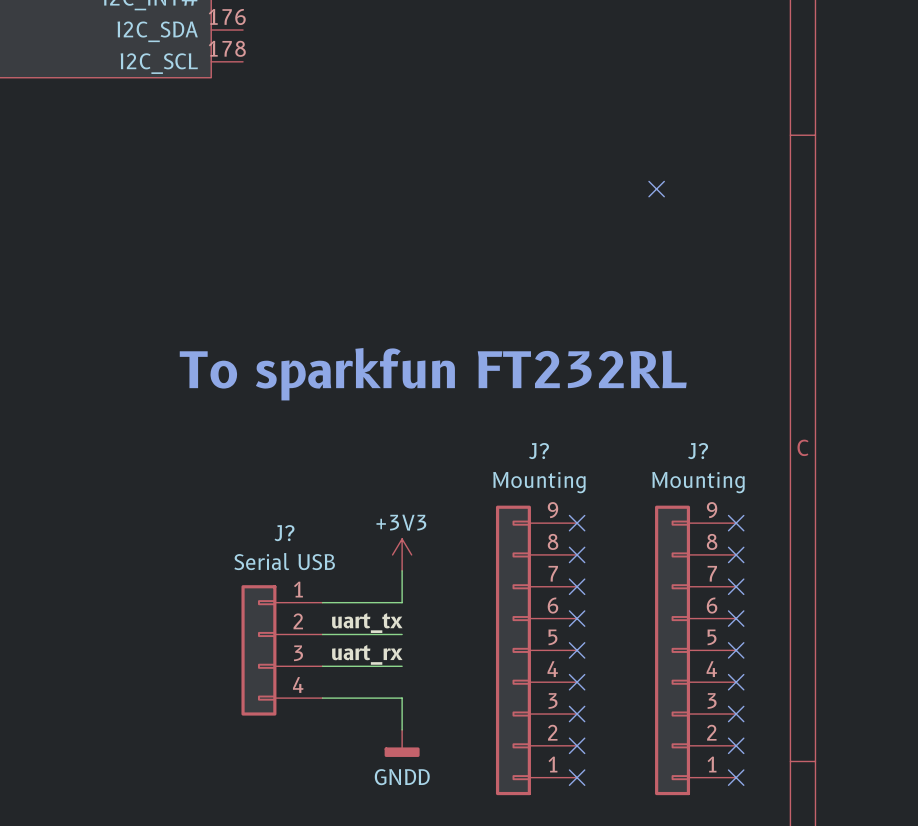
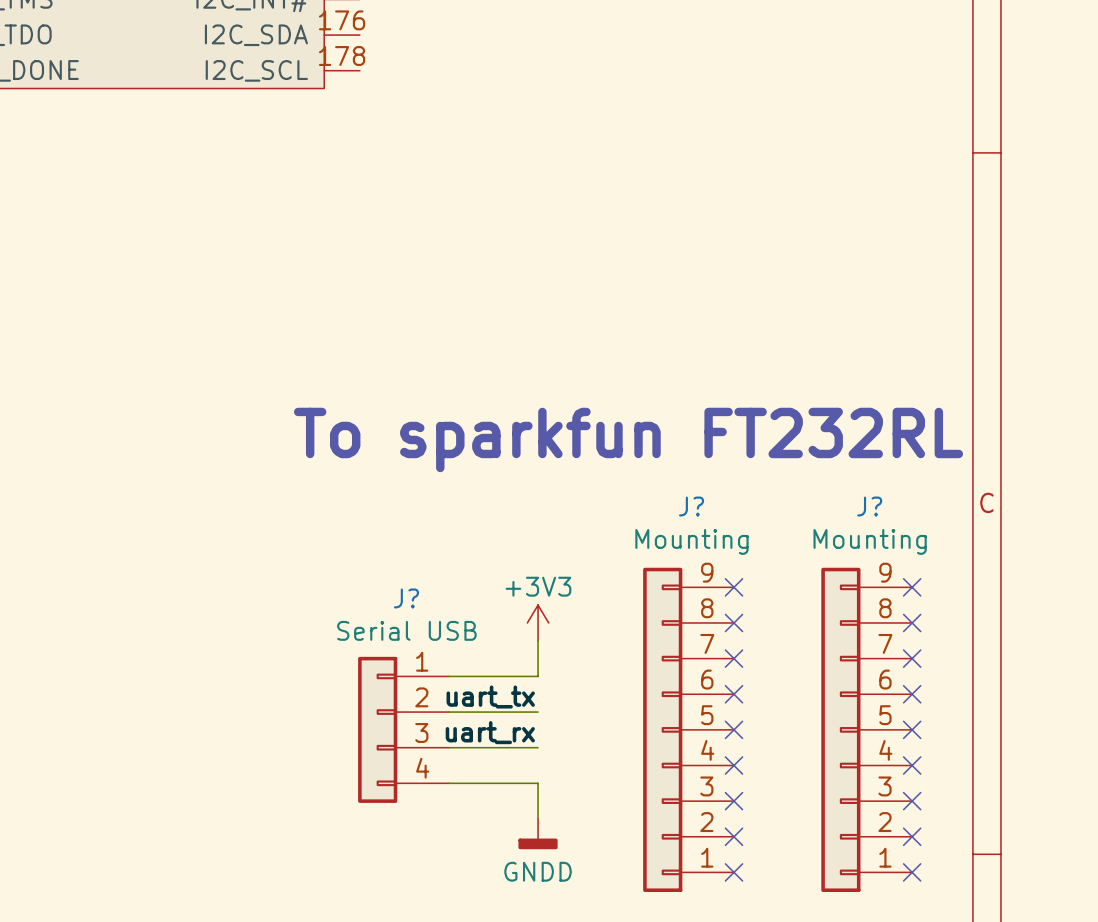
no-connect mark: (656, 189) -> none
text position: To sparkfun FT232RL (433, 374) -> To sparkfun FT232RL (628, 439)

